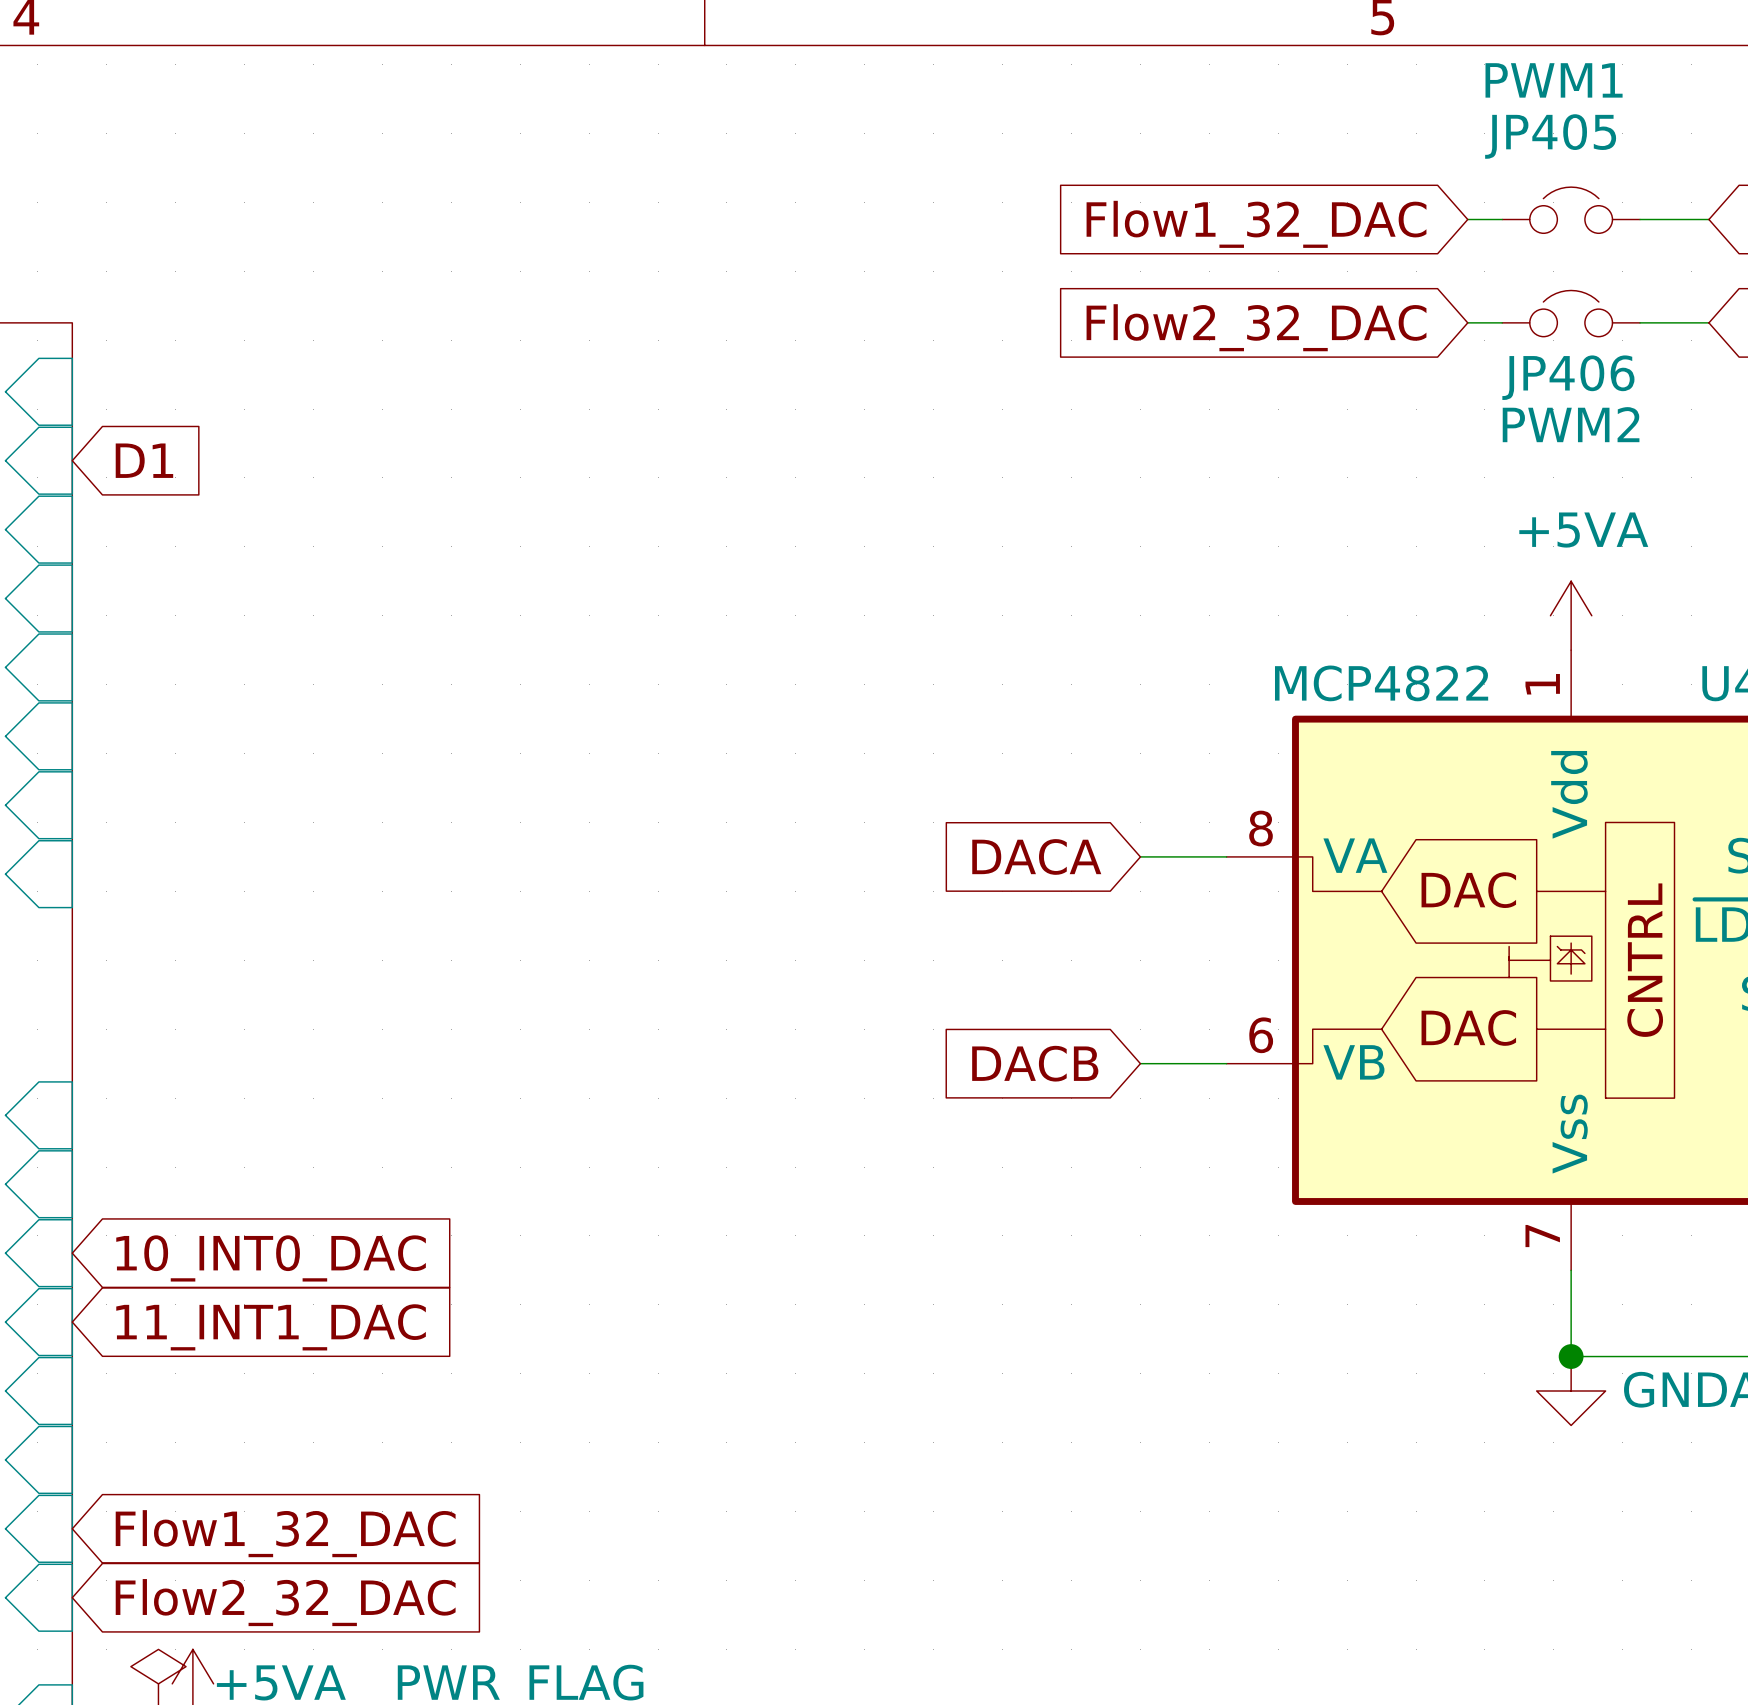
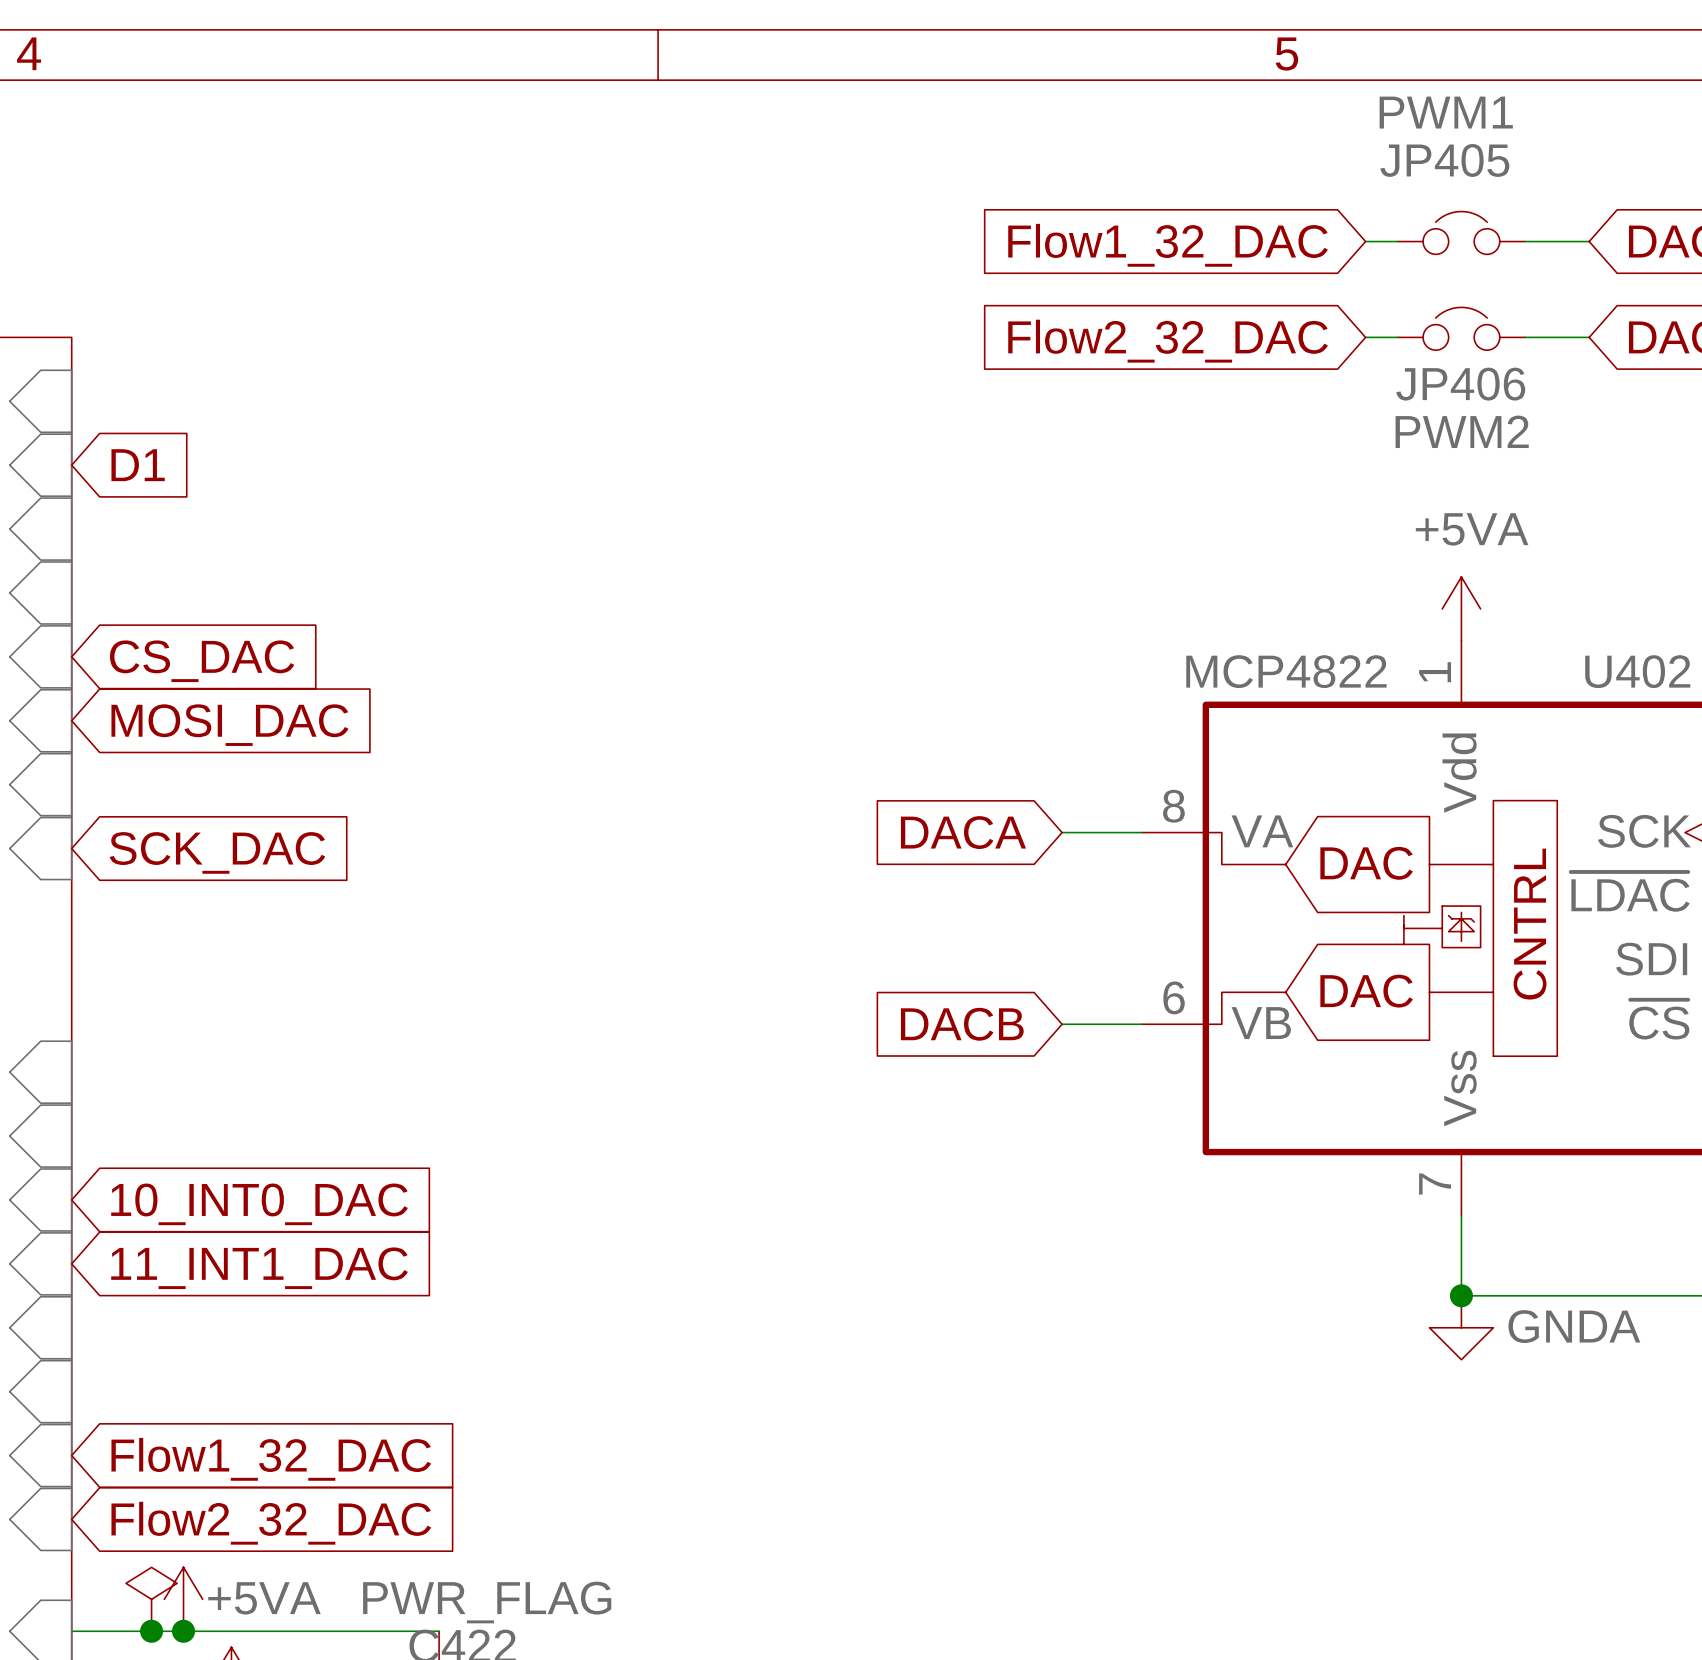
global label: none -> CS_DAC (202, 661)
global label: none -> MOSI_DAC (229, 725)
global label: none -> SCK_DAC (217, 852)

